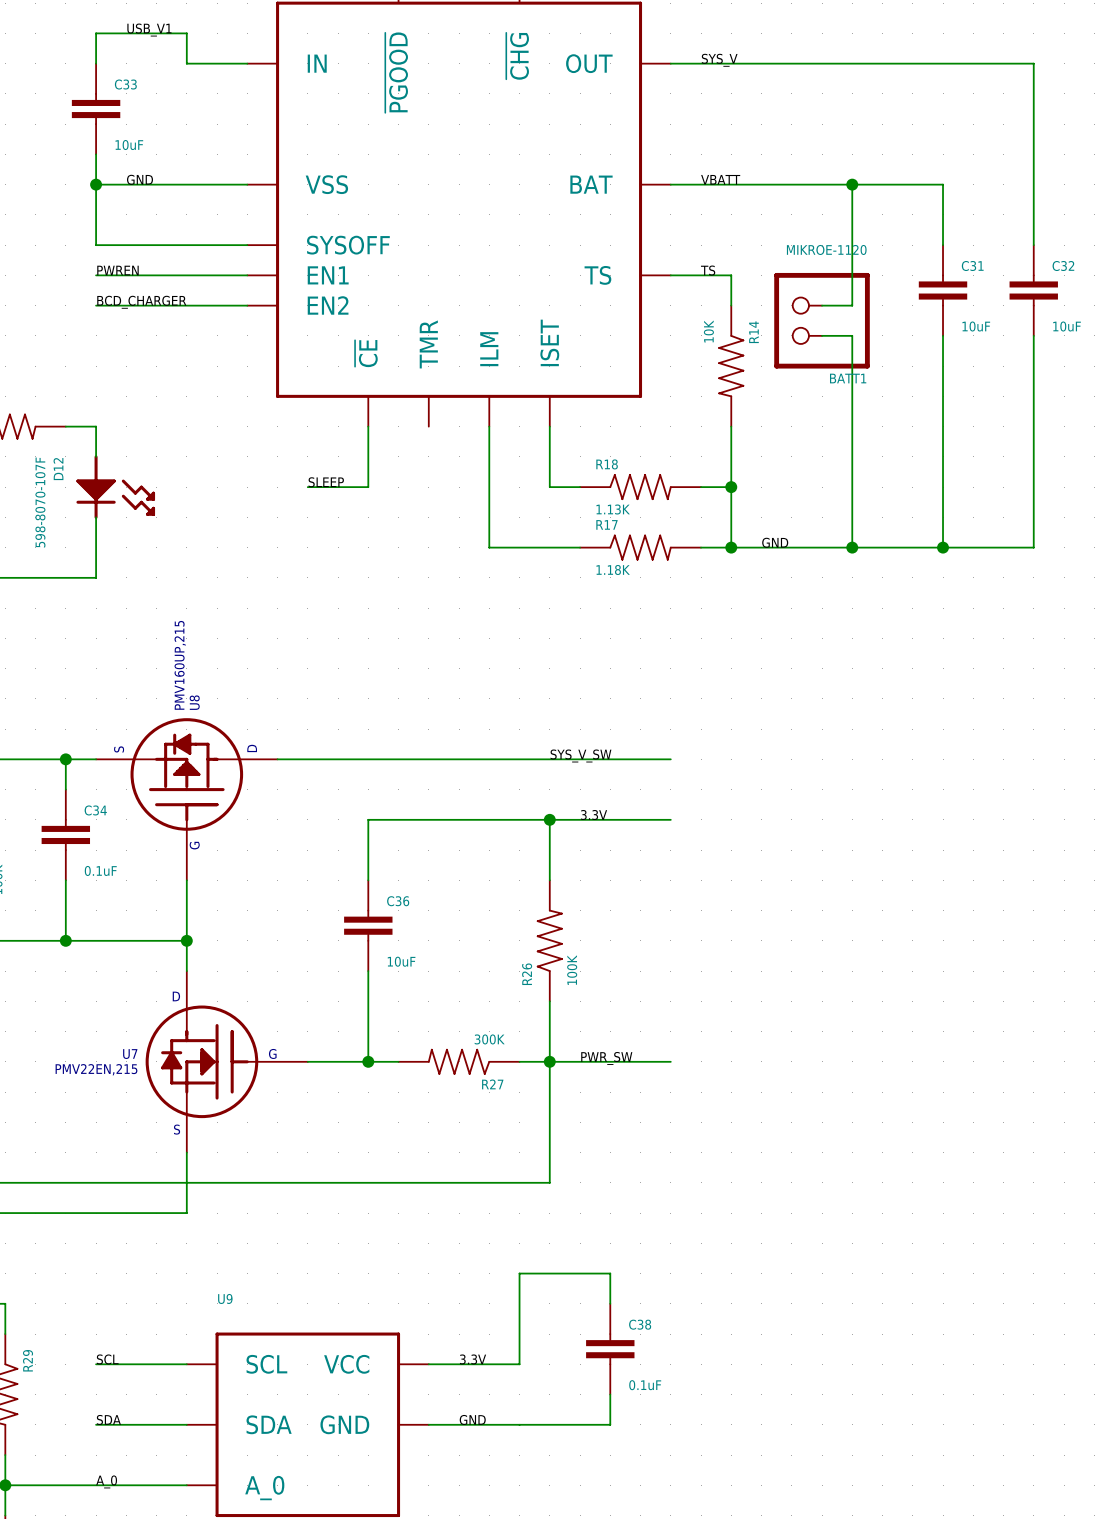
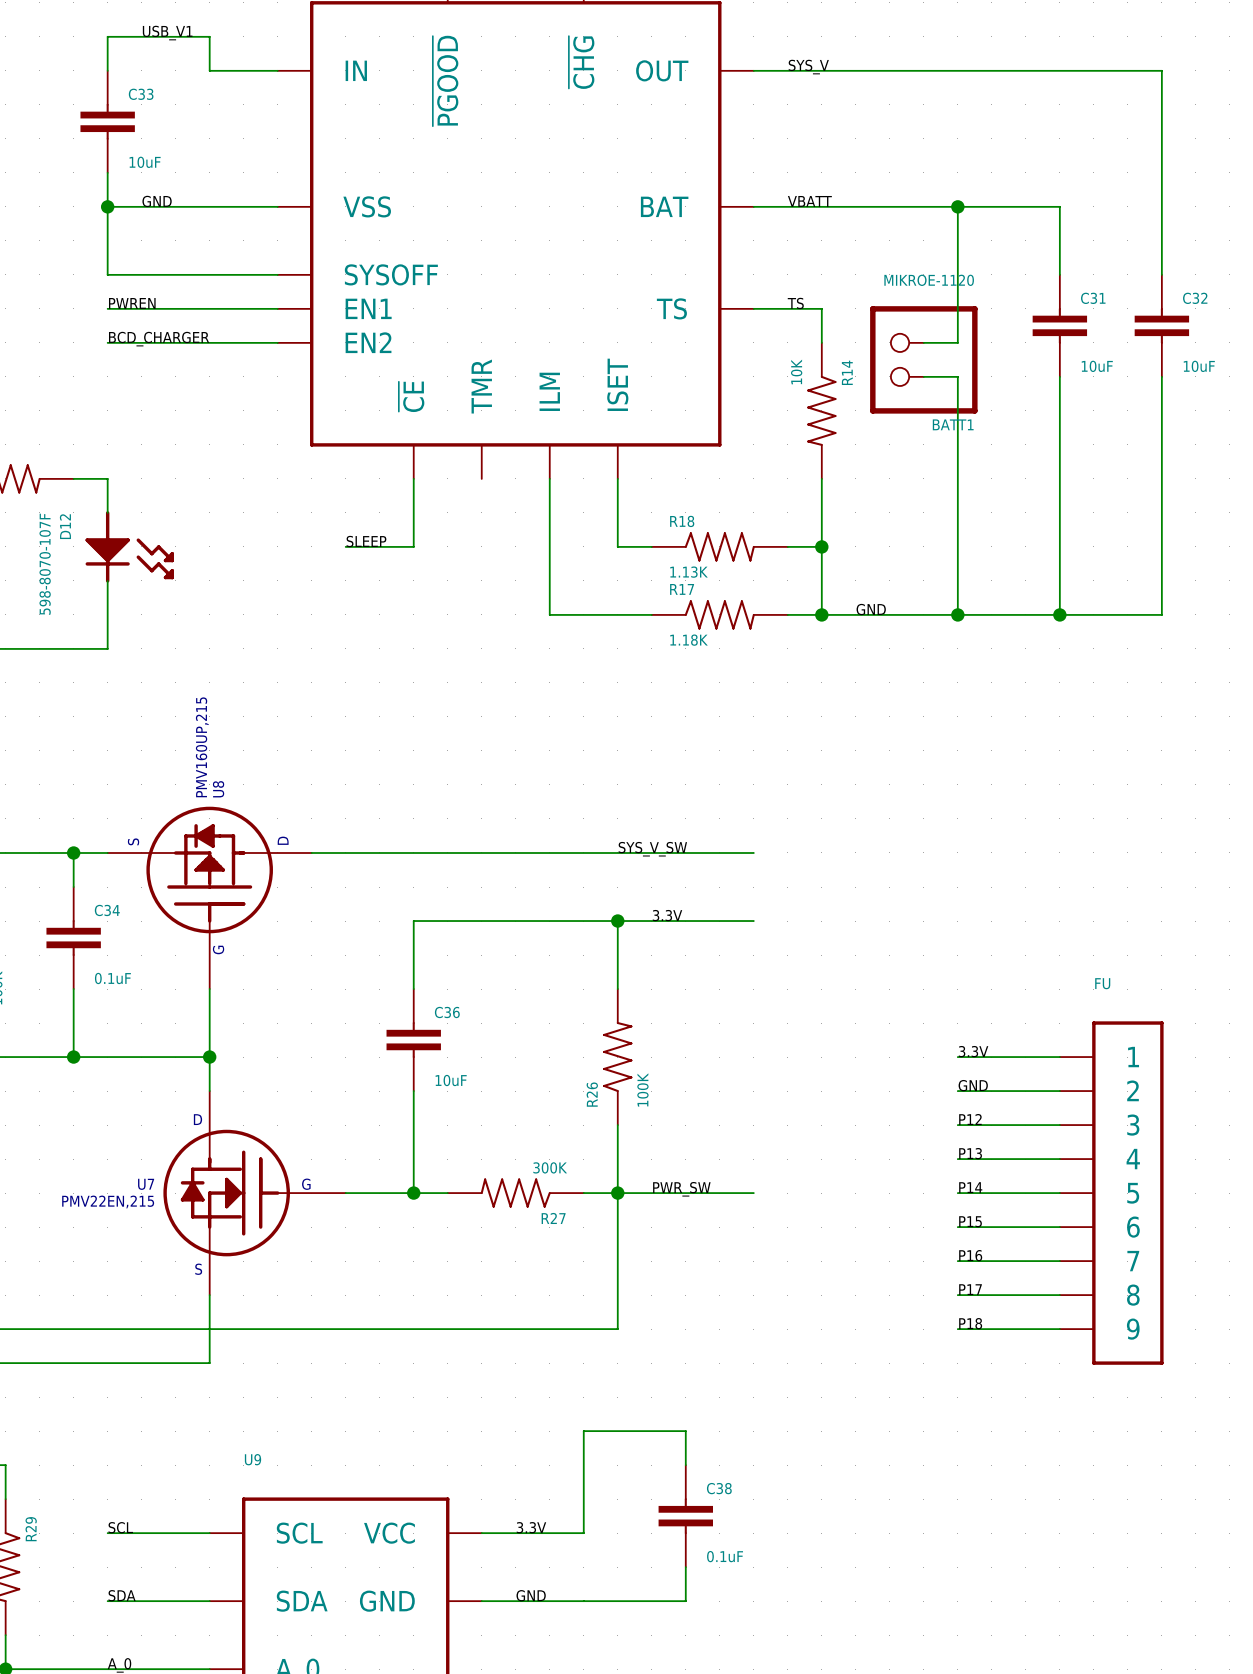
label: none -> 3.3V (973, 1051)
wire: none -> (957, 1057) (1059, 1057)
label: none -> GND (973, 1085)
wire: none -> (957, 1091) (1059, 1091)
label: none -> P12 (970, 1119)
wire: none -> (957, 1125) (1059, 1125)
label: none -> P13 (970, 1153)
wire: none -> (957, 1159) (1059, 1159)
label: none -> P14 (970, 1187)
wire: none -> (957, 1193) (1059, 1193)
FU: none -> (1111, 1193)
label: none -> P15 (970, 1221)
wire: none -> (957, 1227) (1059, 1227)
label: none -> P16 (970, 1255)
wire: none -> (957, 1261) (1059, 1261)
label: none -> P17 (970, 1289)
wire: none -> (957, 1295) (1059, 1295)
label: none -> P18 (970, 1323)
wire: none -> (957, 1329) (1059, 1329)

